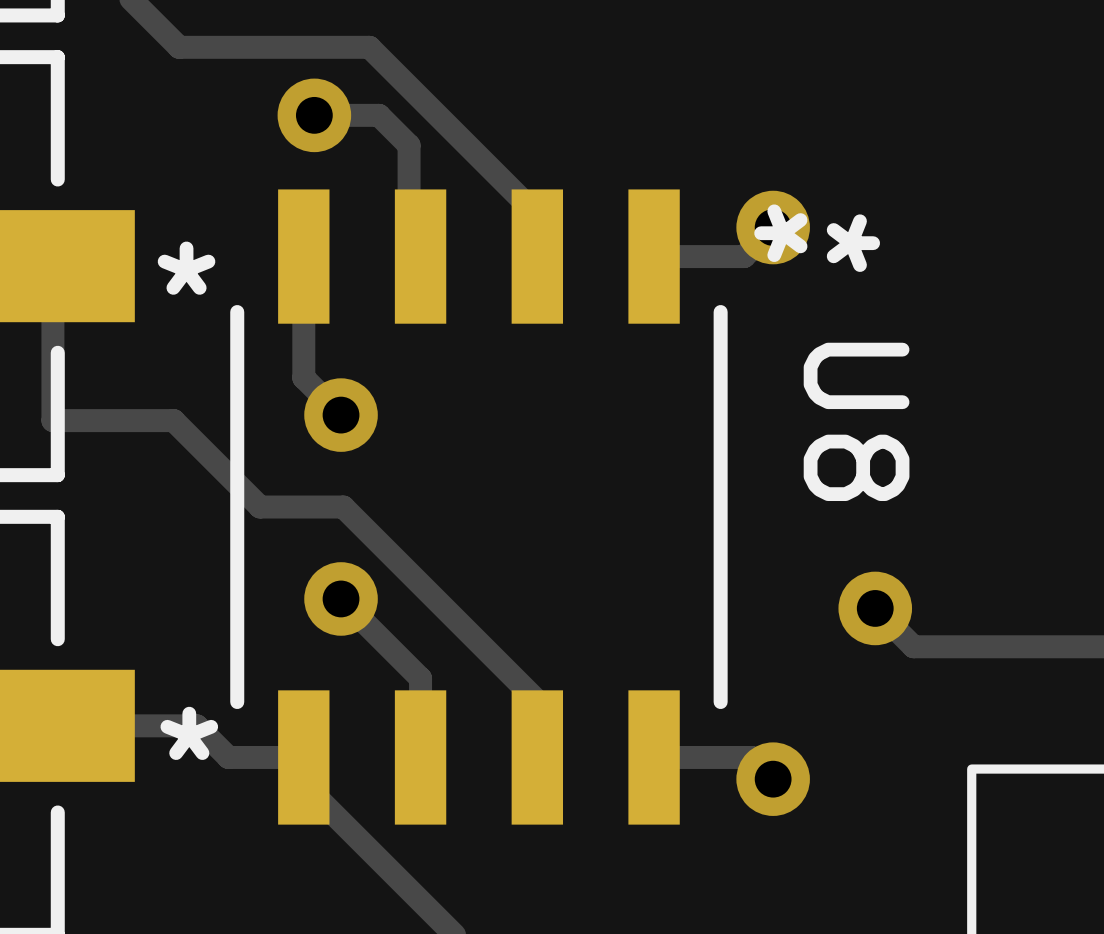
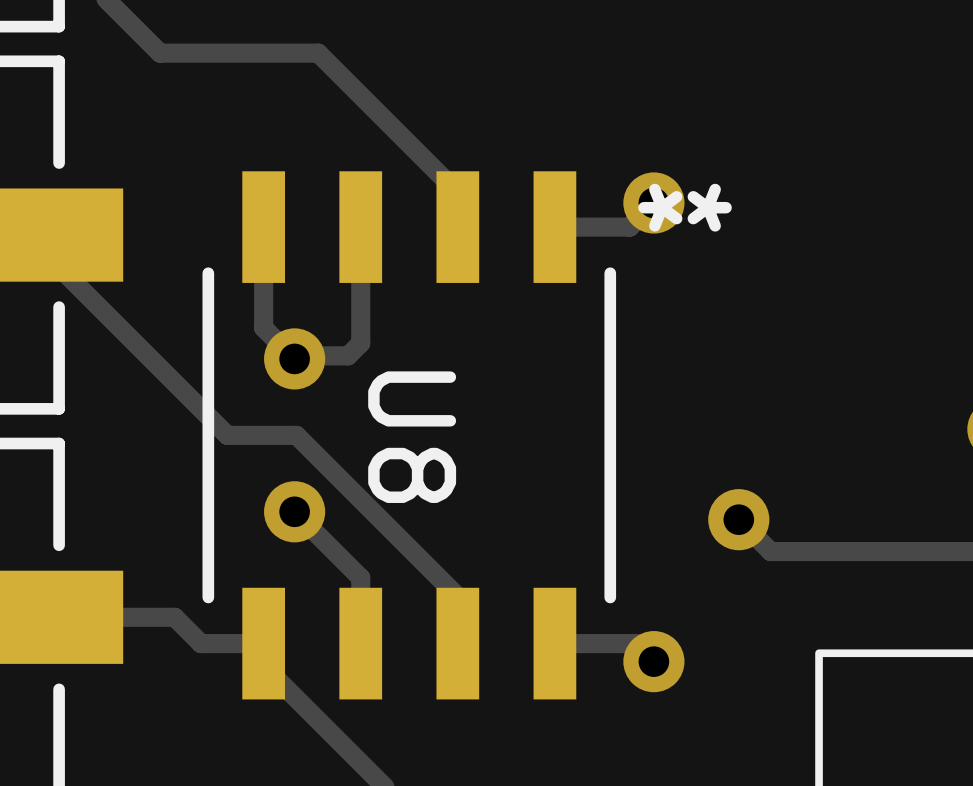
track: (314, 115) (379, 115) (409, 145) (409, 209) -> none
via: (314, 115) -> none
U8 footprint: [230, 189, 728, 825] -> [202, 171, 617, 700]
track: none -> (360, 227) (360, 343) (348, 355) (297, 355)
text: * (186, 268) -> none
track: (52, 299) (52, 420) (173, 420) -> (55, 263) (155, 363)
U8 name position: U8 (856, 421) -> U8 (412, 437)
text: * (189, 733) -> none

